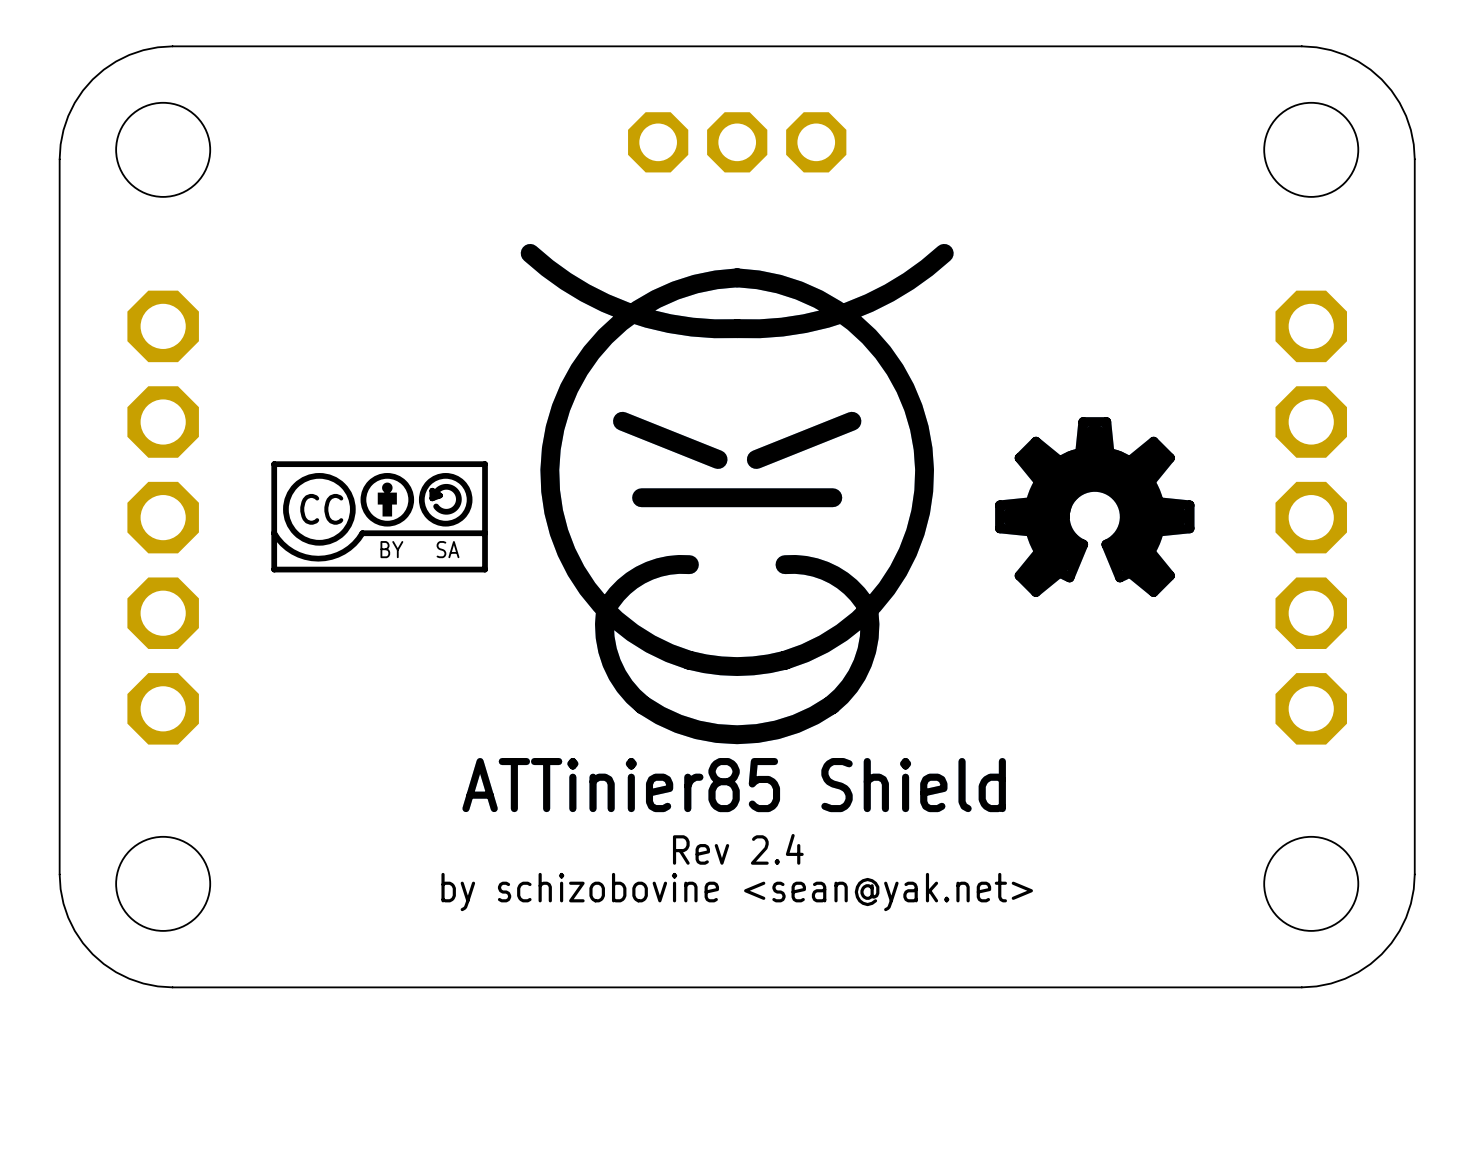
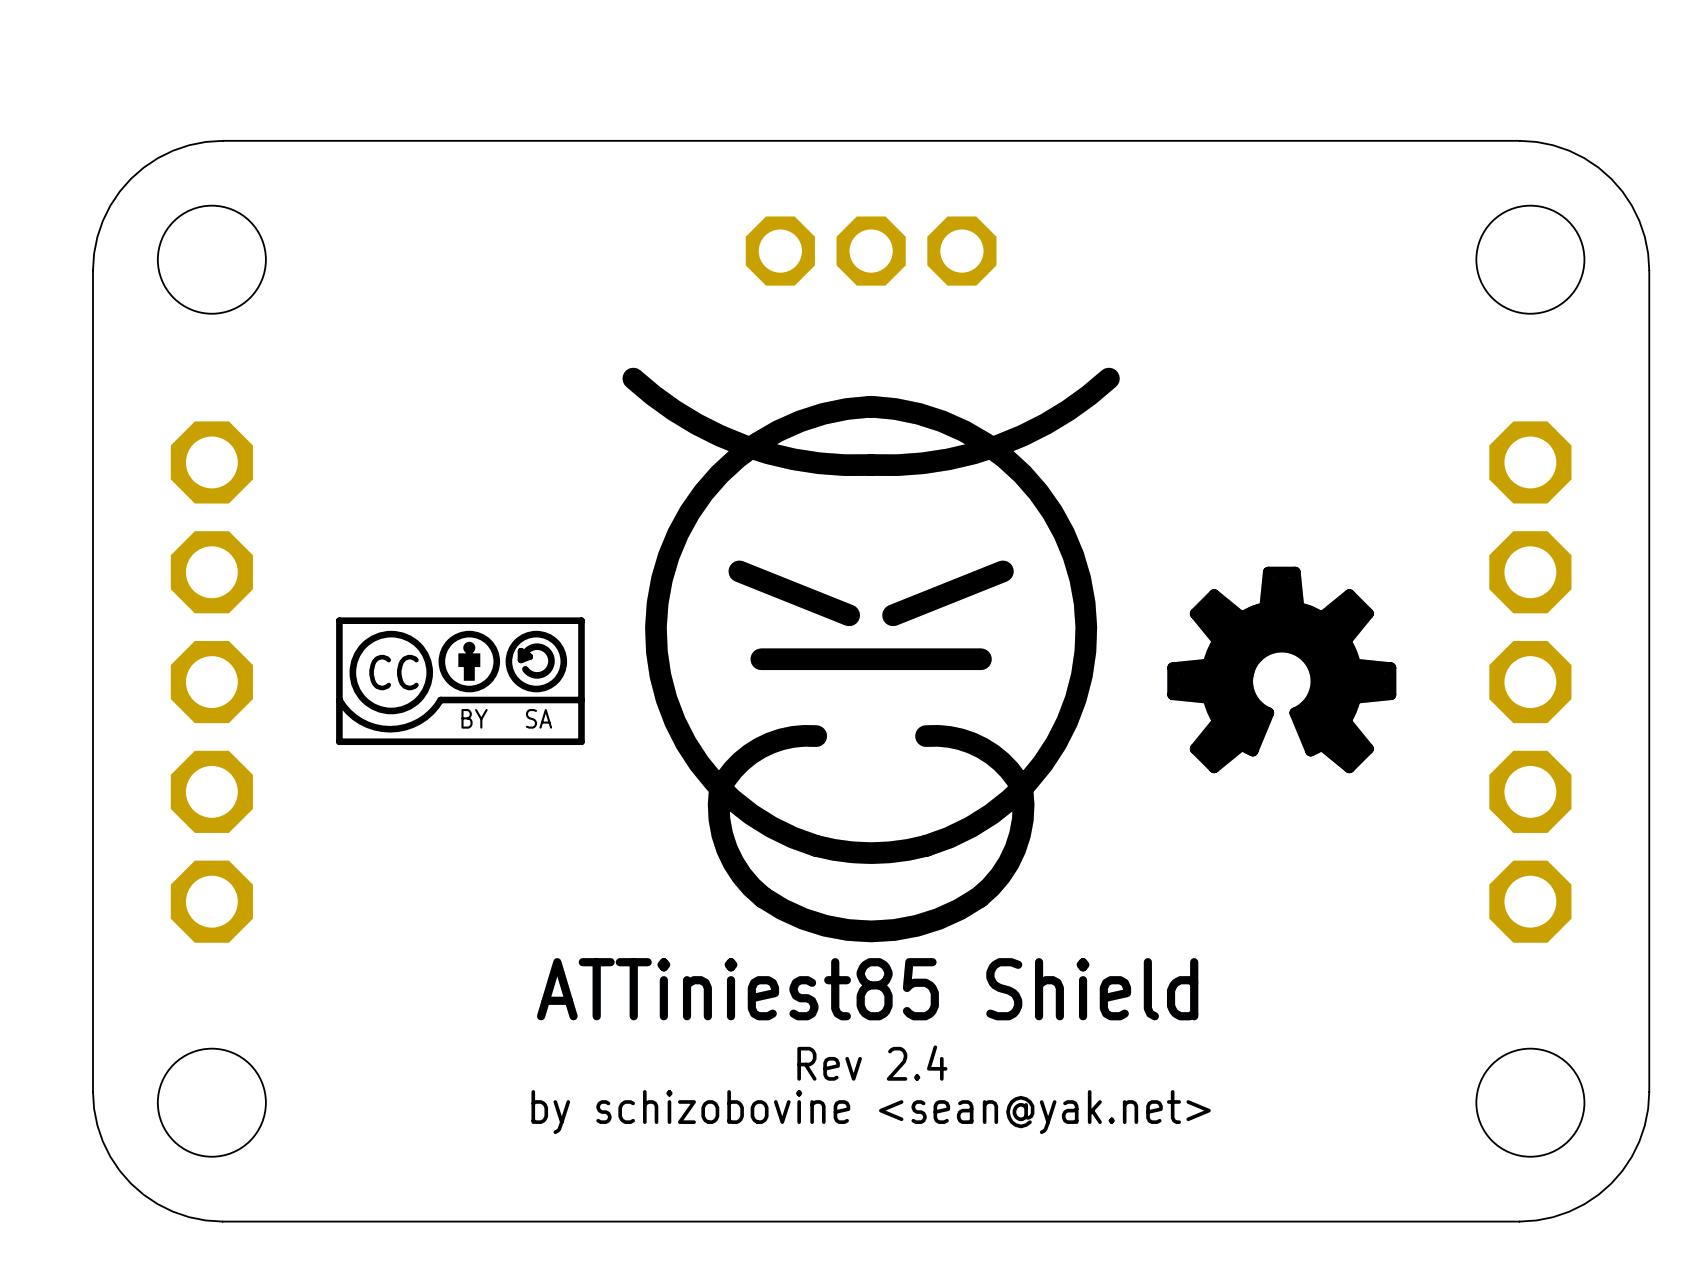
text: ATTinier85 Shield (734, 785) -> none
text: none -> ATTiniest85 Shield (867, 989)

